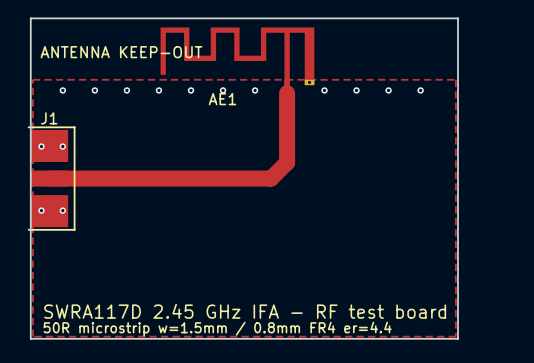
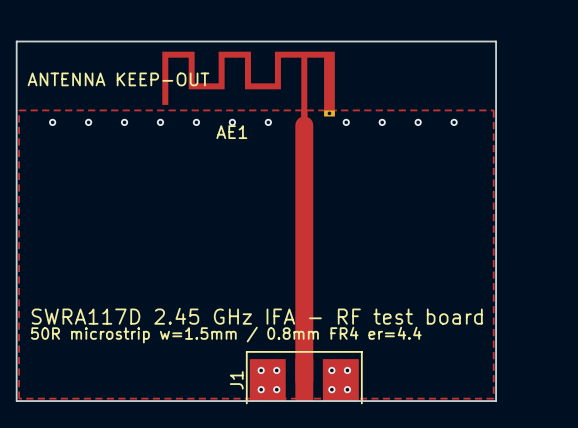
via: (41, 146) -> none
via: (62, 146) -> none
track: (287, 162) (271, 178) (49, 178) -> (304, 203) (304, 380)
J1 rotation: 0° (51, 178) -> 90° counterclockwise (304, 377)
J1 position: (51, 178) -> (304, 377)
via: (41, 210) -> none
via: (62, 210) -> none
text position: SWRA117D 2.45 GHz IFA - RF test board (245, 311) -> SWRA117D 2.45 GHz IFA - RF test board (257, 316)
via: none -> (261, 370)
via: none -> (276, 370)
via: none -> (331, 370)
via: none -> (347, 370)
via: none -> (261, 389)
via: none -> (276, 389)
via: none -> (331, 389)
via: none -> (347, 389)
text position: 50R microstrip w=1.5mm / 0.8mm FR4 er=4.4 (217, 329) -> 50R microstrip w=1.5mm / 0.8mm FR4 er=4.4 (226, 335)

